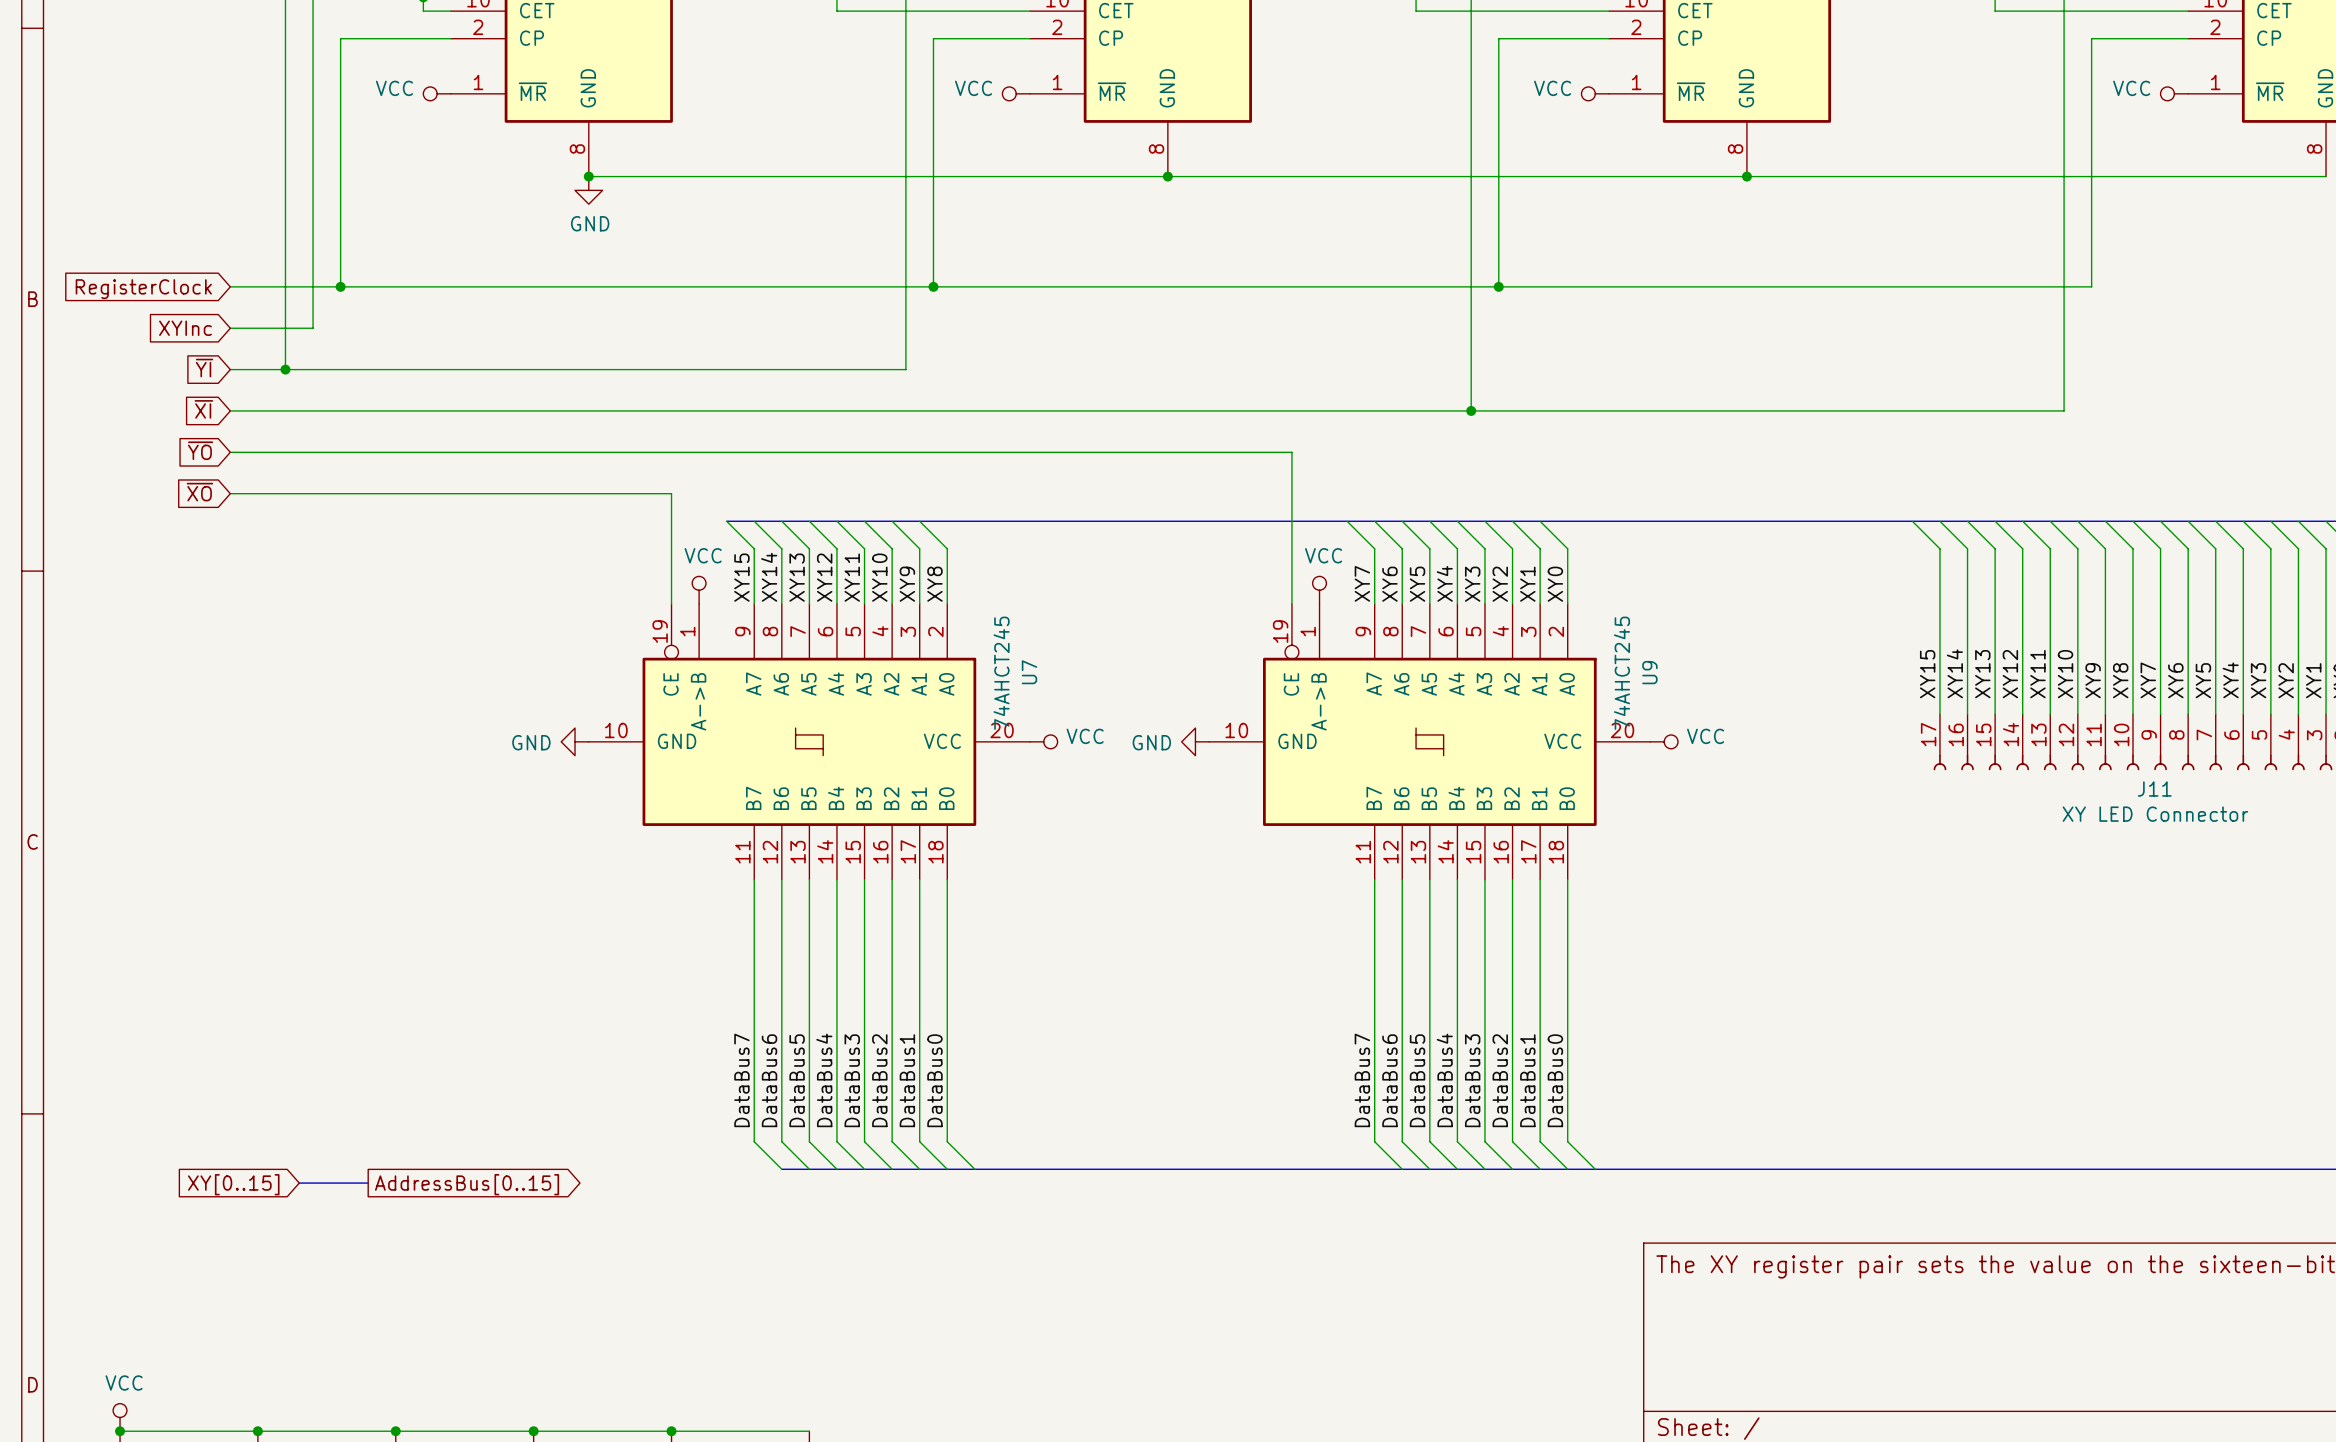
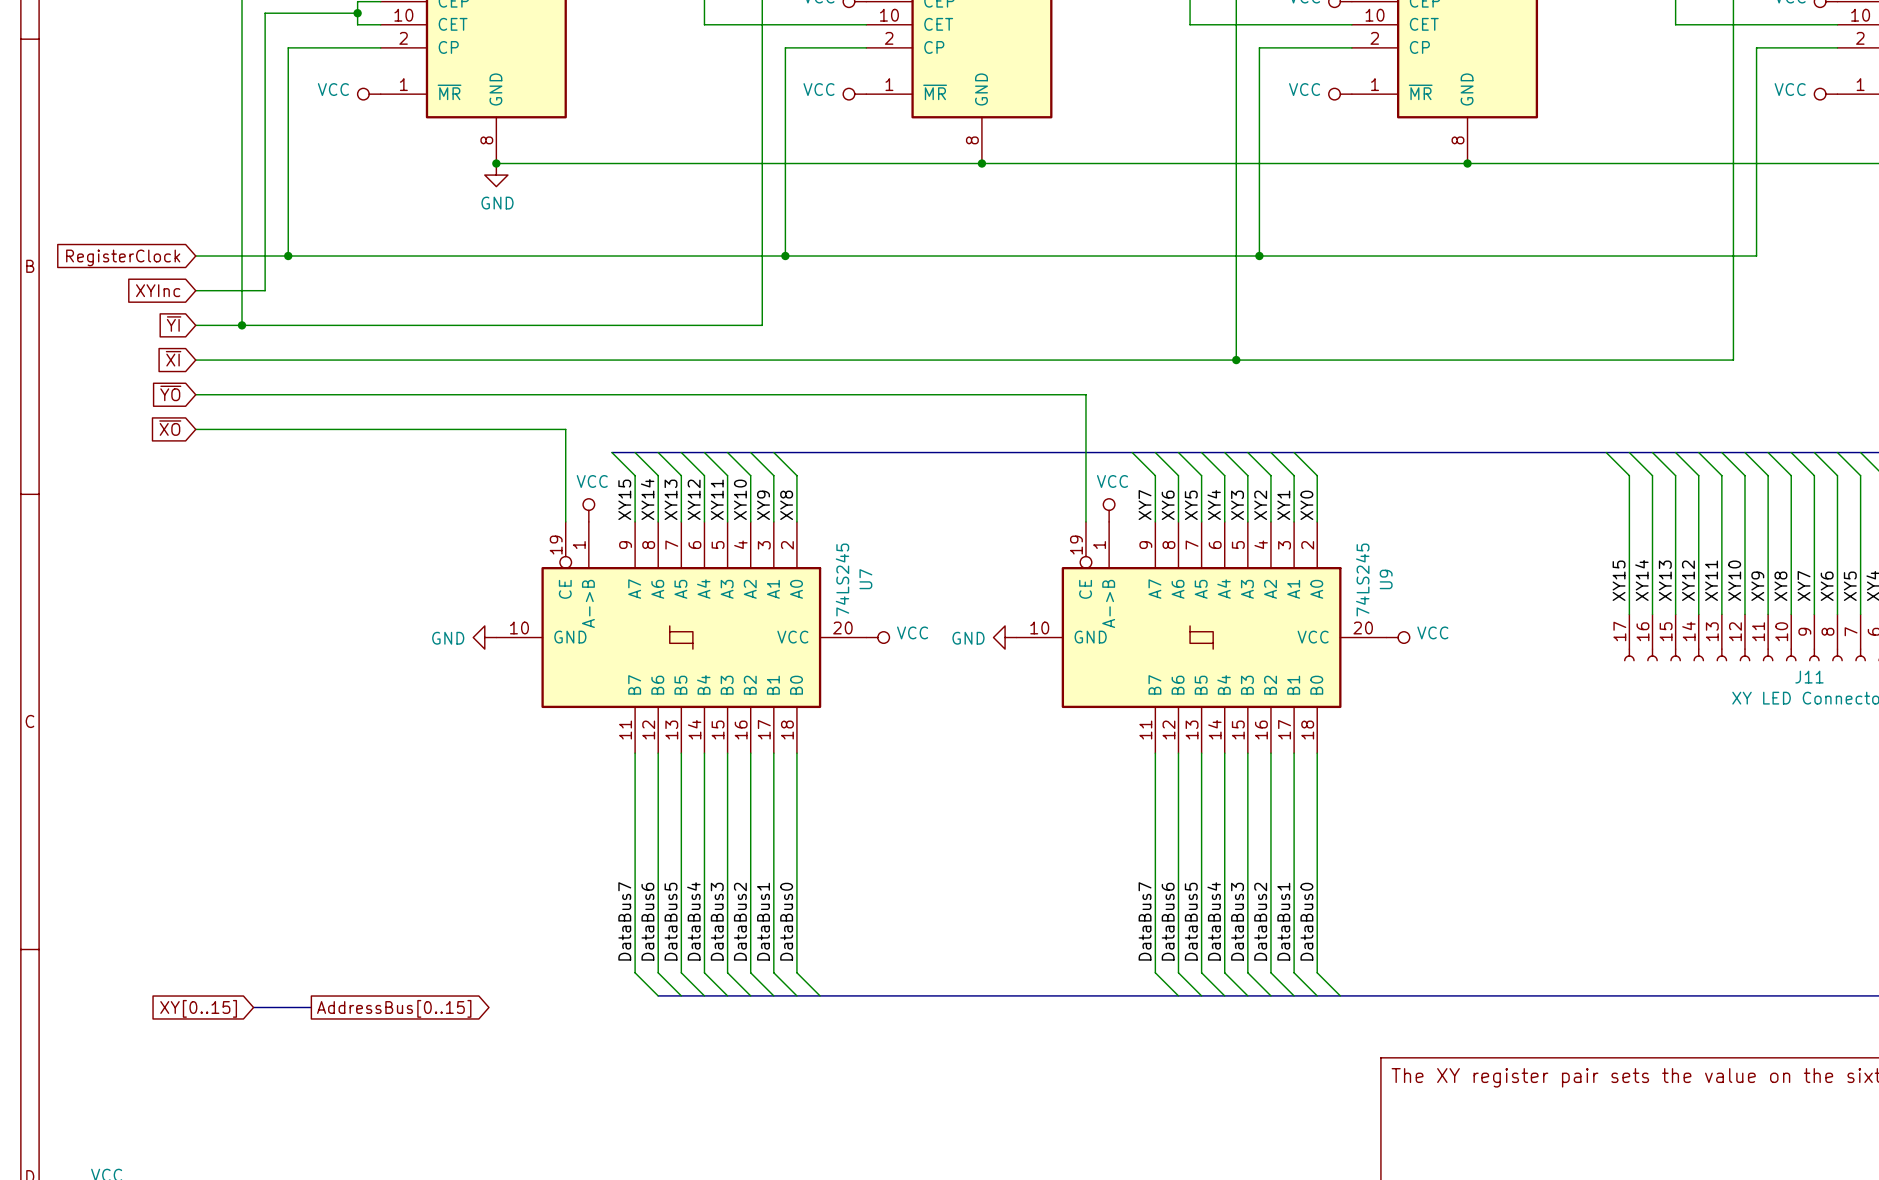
U7 value: 74AHCT245 (1001, 673) -> 74LS245 (842, 580)
U9 value: 74AHCT245 (1622, 673) -> 74LS245 (1362, 580)

